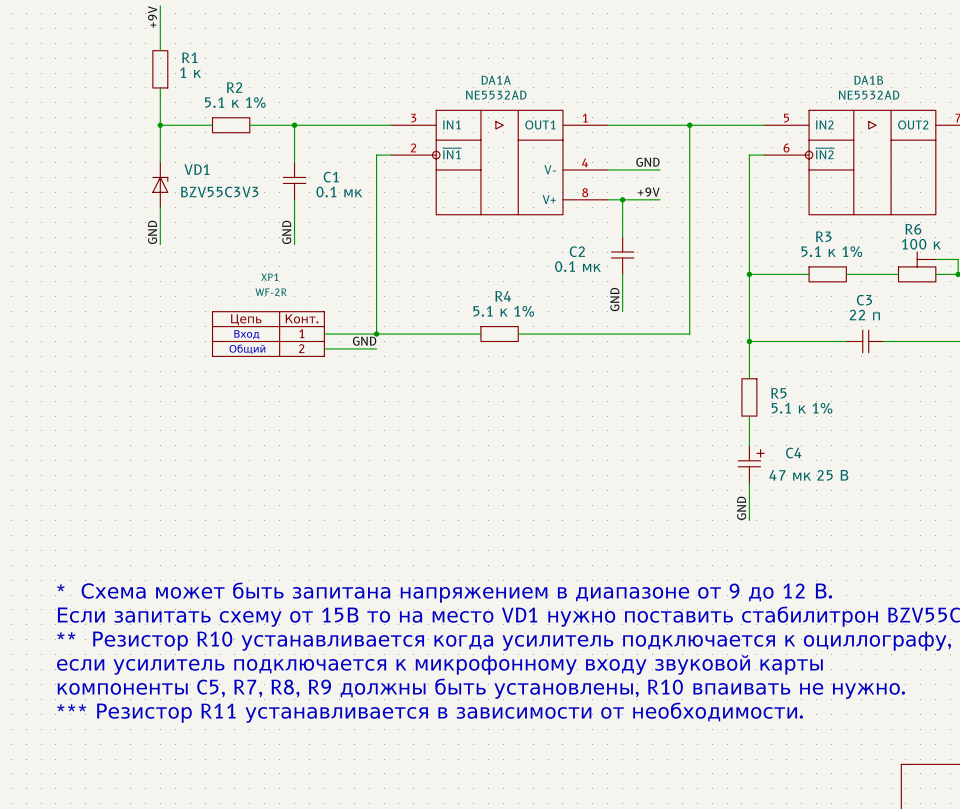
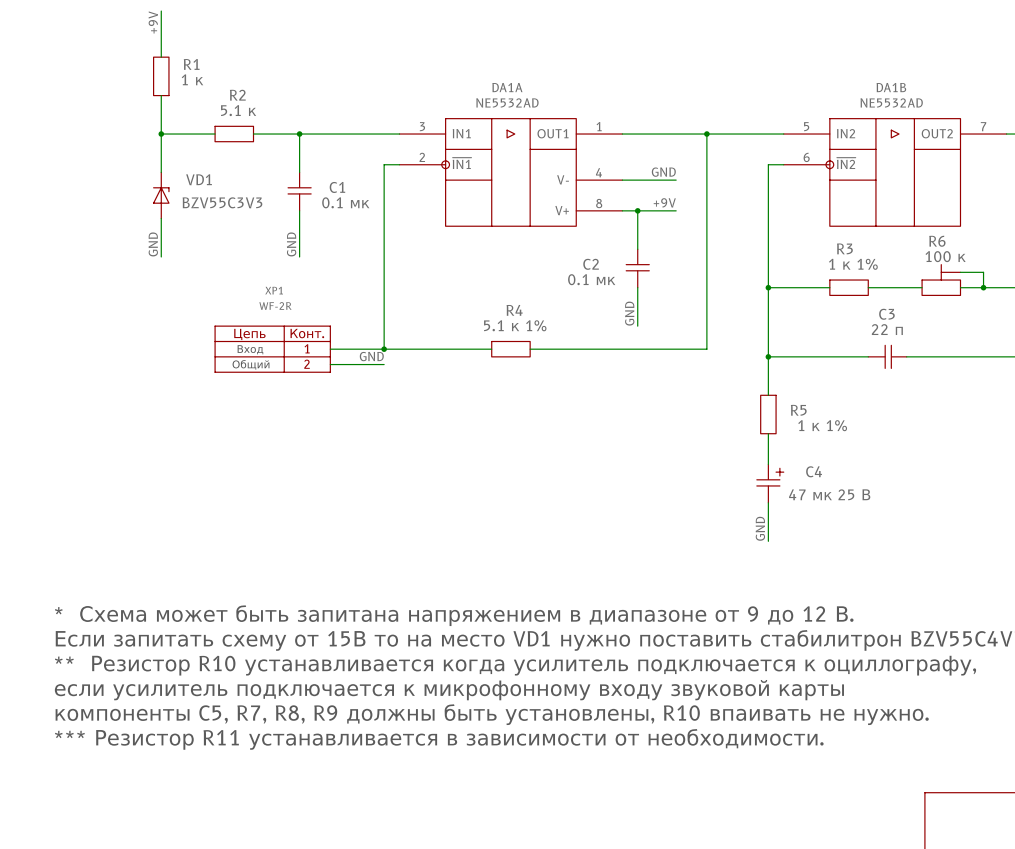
R2 value: 5.1 к 1% (235, 102) -> 5.1 к (238, 110)
R3 value: 5.1 к 1% (831, 251) -> 1 к 1% (853, 264)
R5 value: 5.1 к 1% (802, 408) -> 1 к 1% (822, 425)

